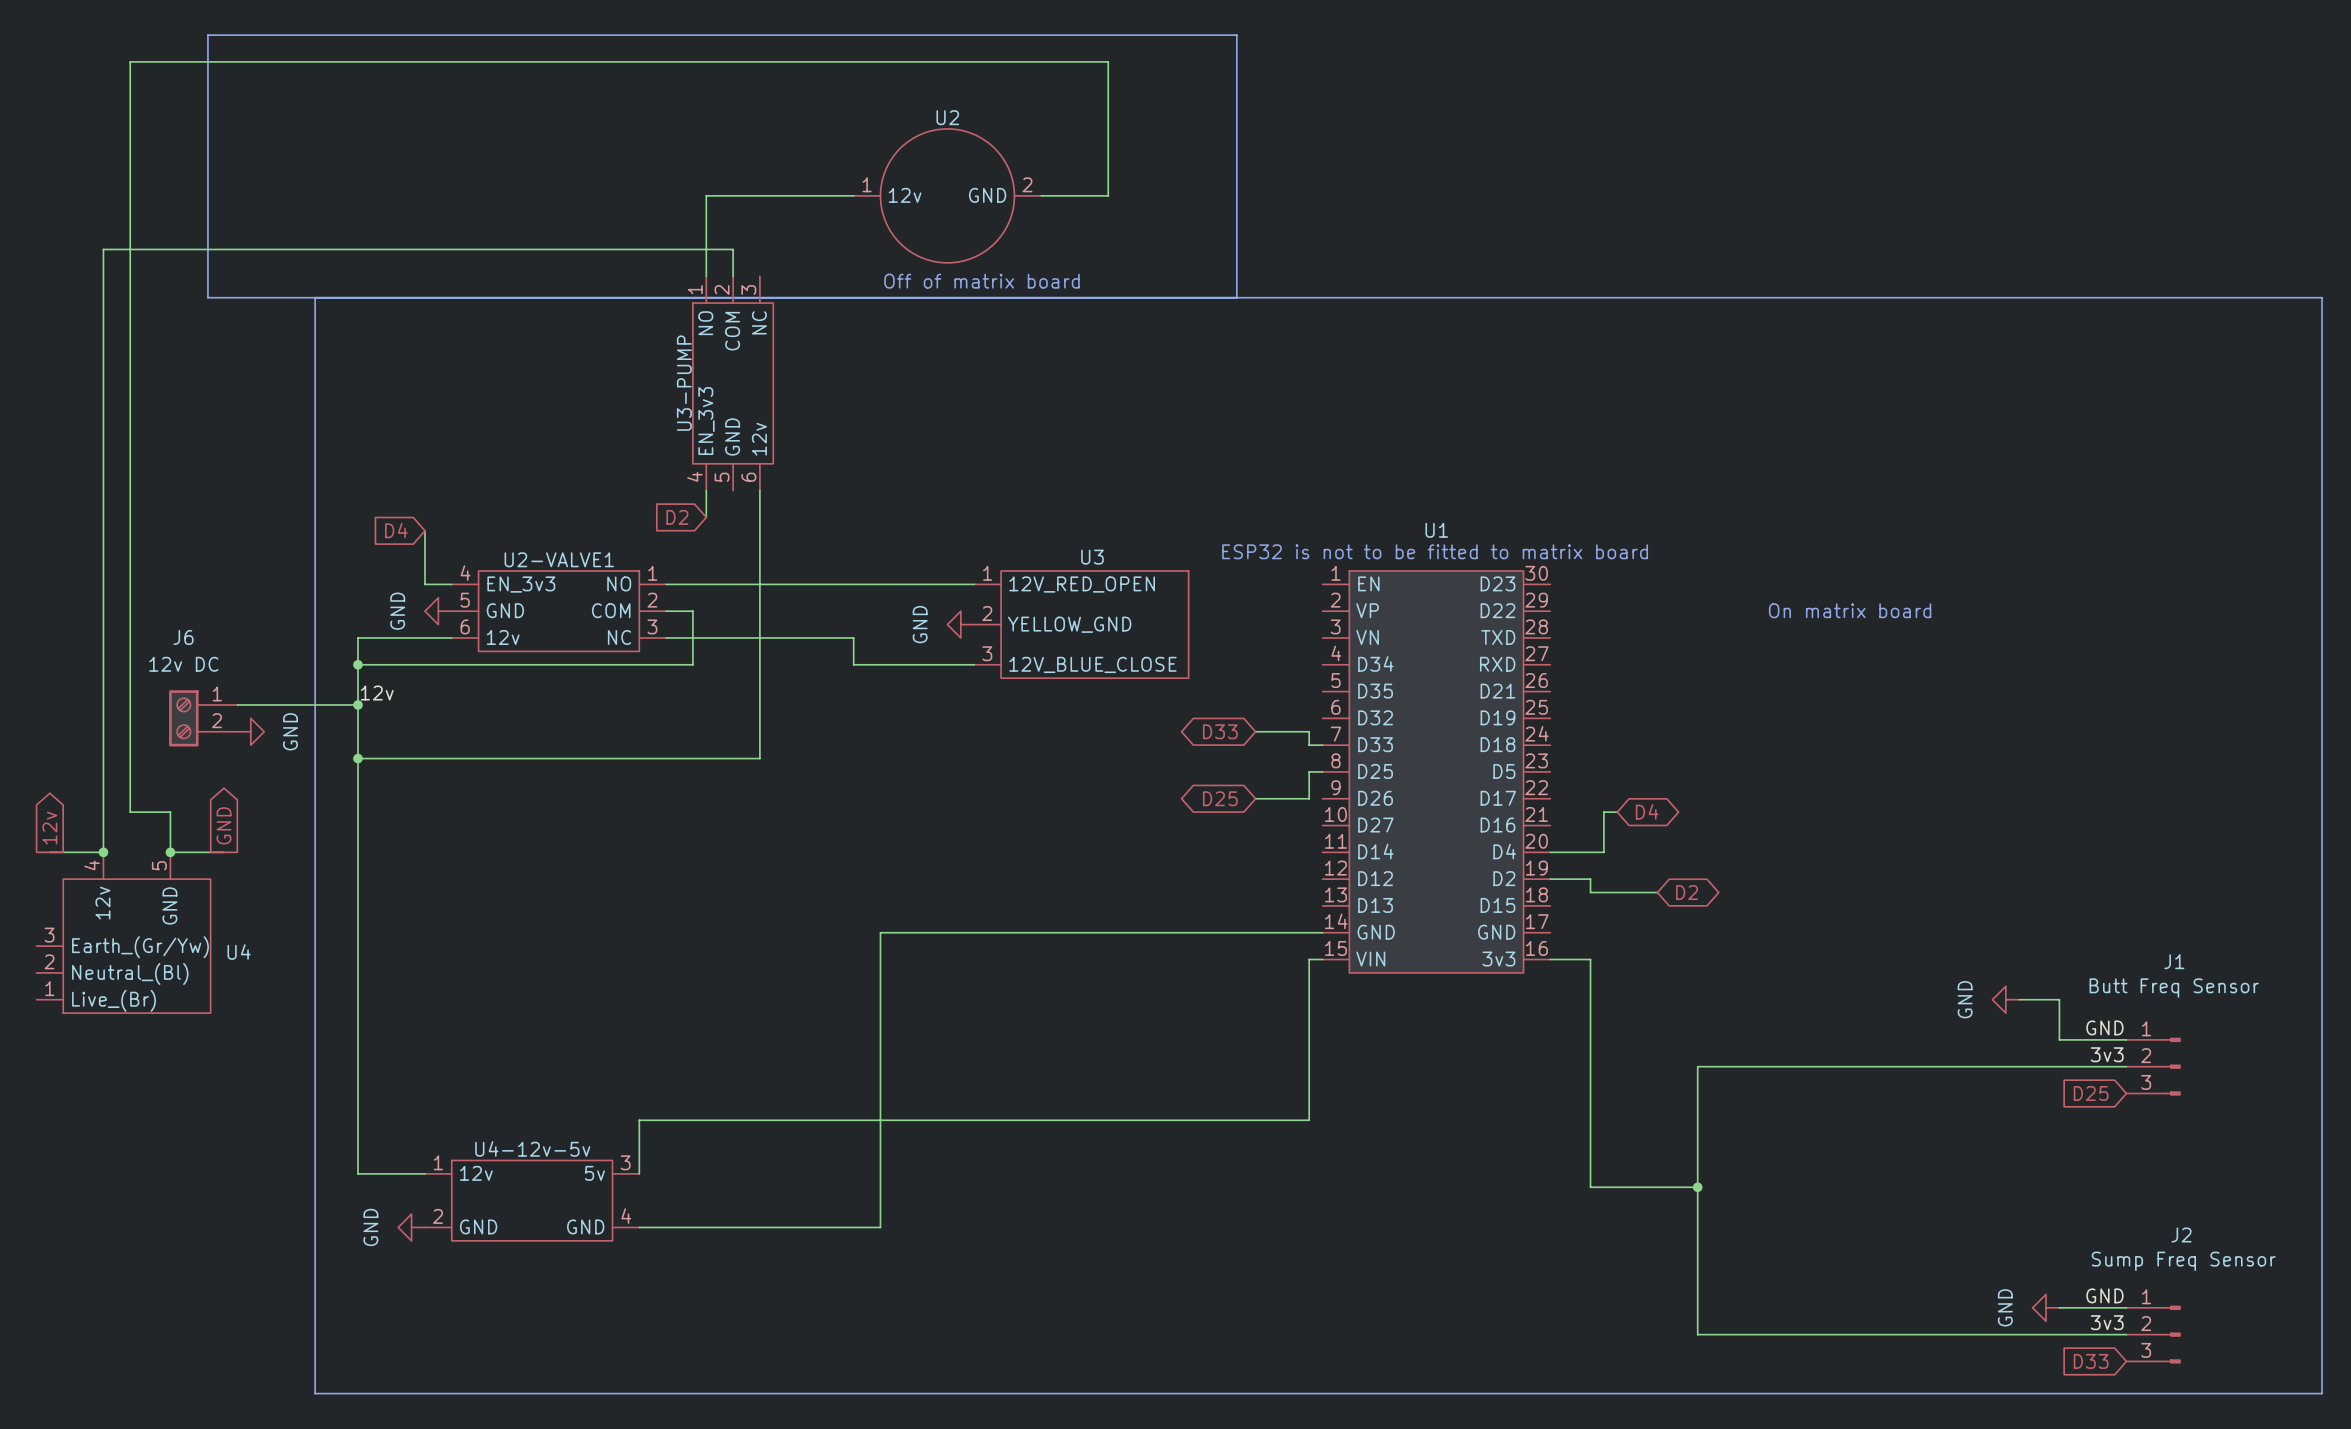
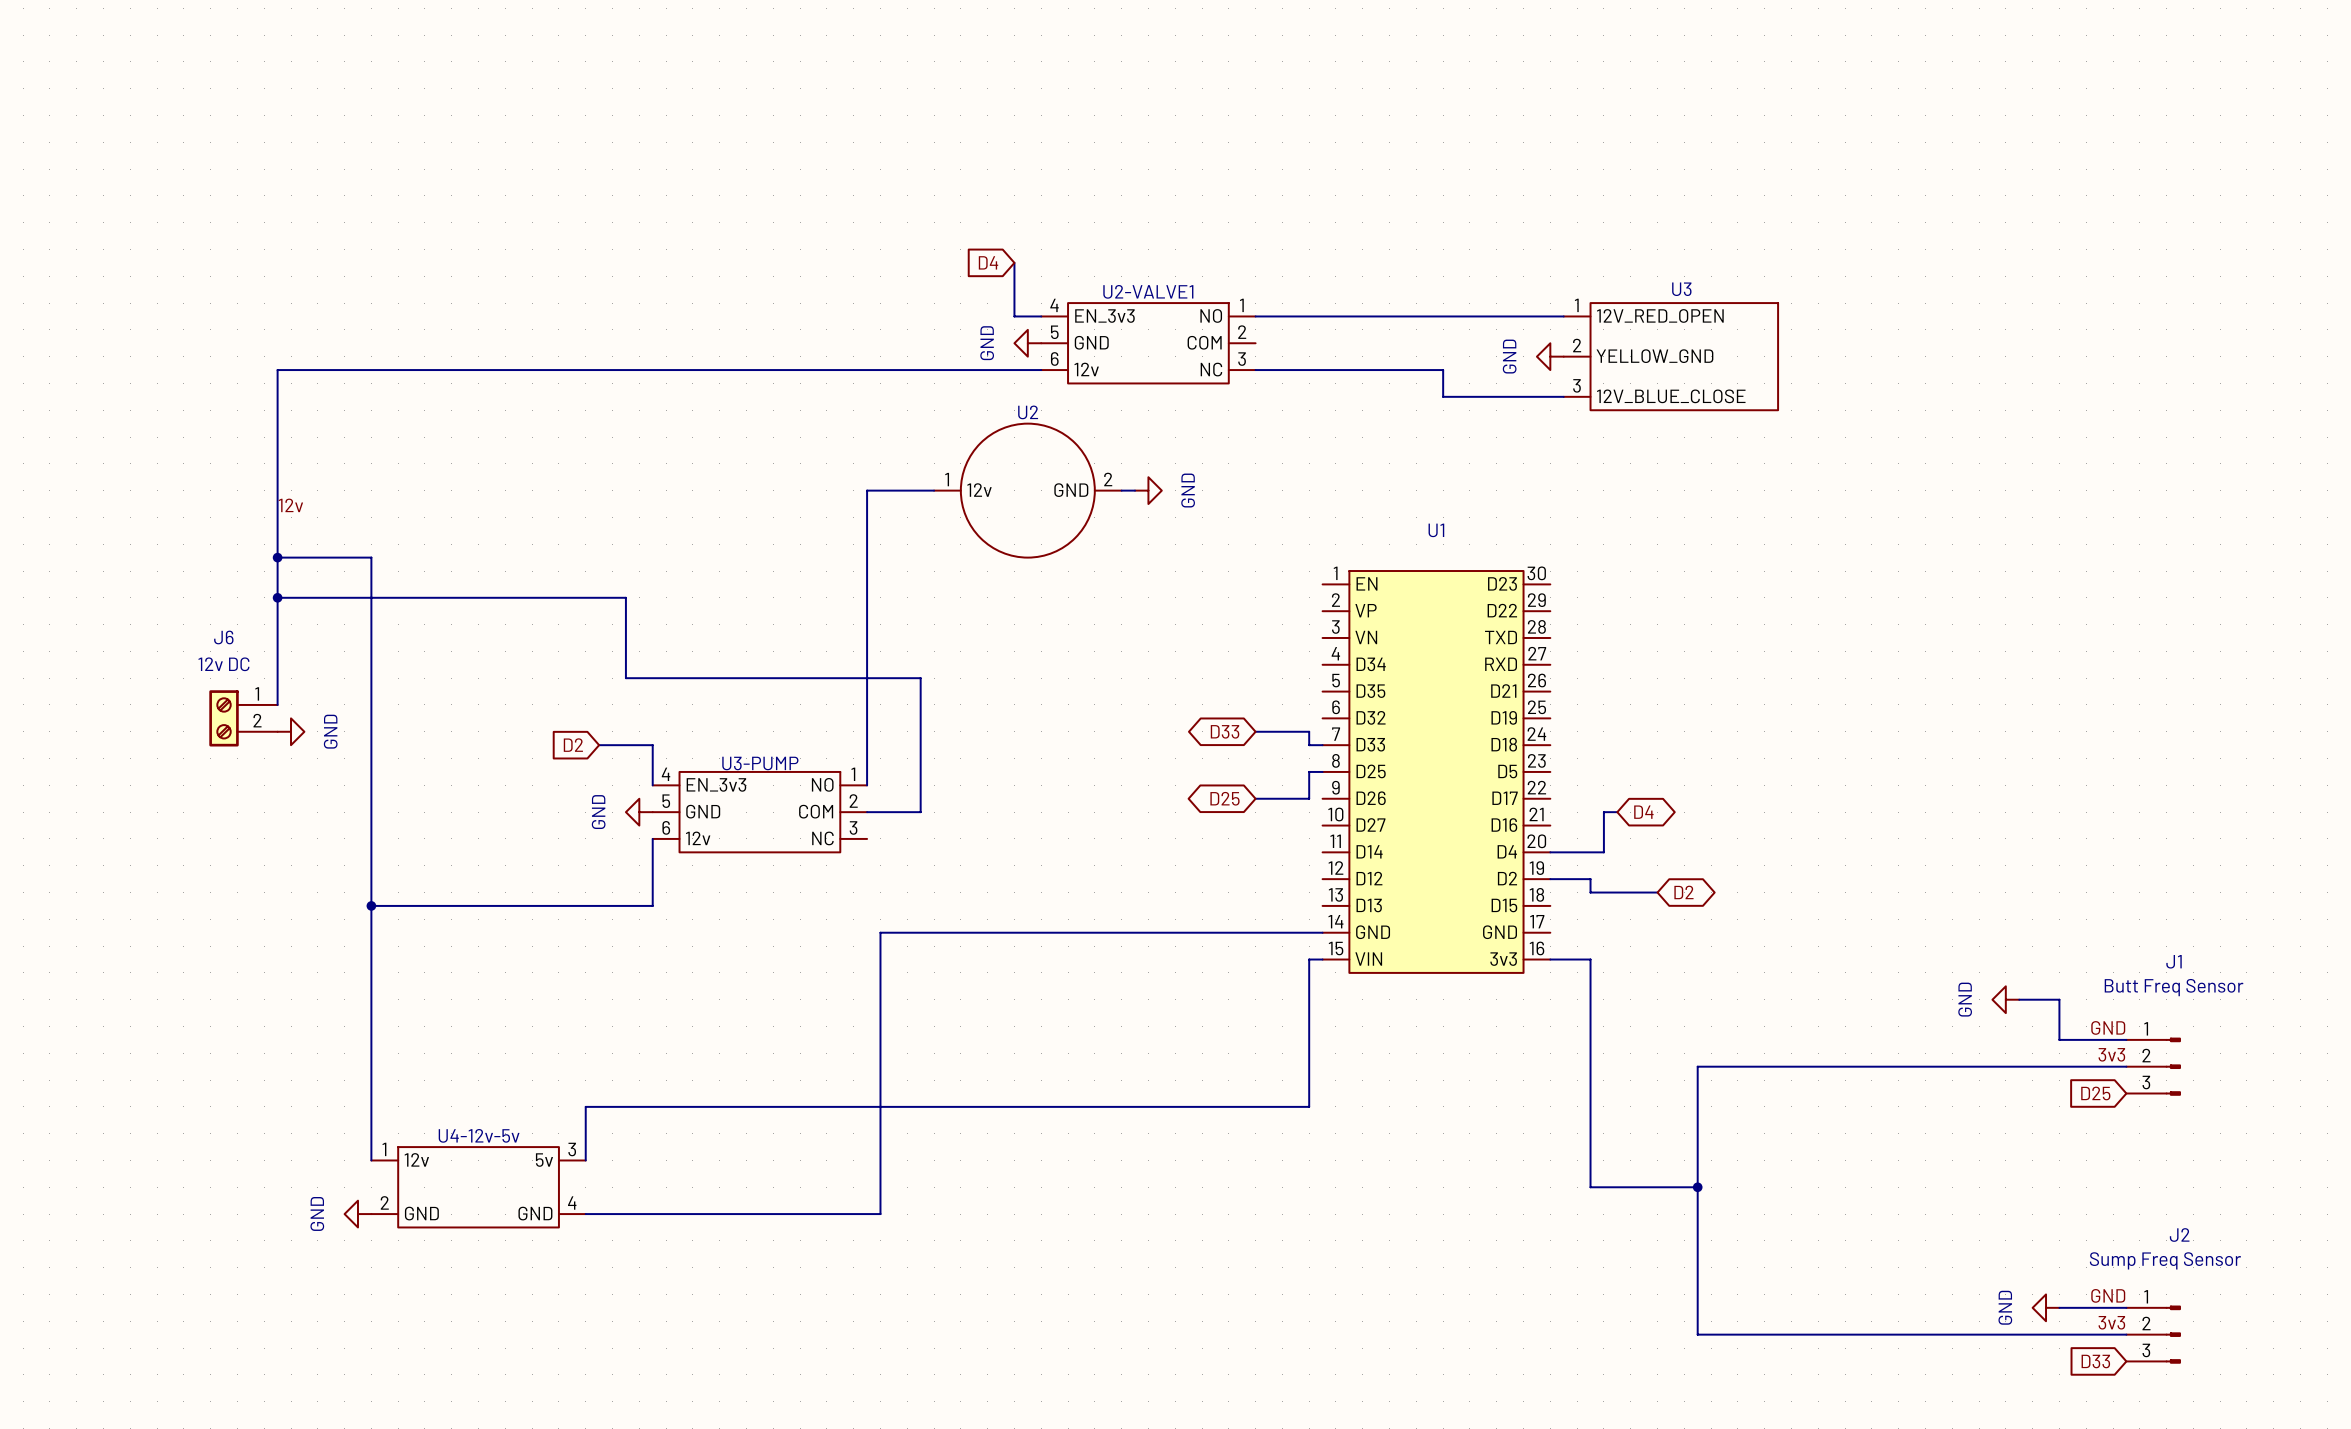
wire: (853, 195) (706, 195) (706, 276) -> none
U2 position: (947, 195) -> (1027, 490)
wire: (1041, 195) (1108, 195) (1108, 61) (130, 61) (130, 812) (170, 812) (170, 852) (224, 852) -> none
global label: none -> D4 (988, 262)
wire: none -> (1014, 262) (1014, 316) (1041, 316)
wire: (733, 276) (733, 249) (103, 249) (103, 852) (49, 852) -> none
text: Off of matrix board (981, 281) -> none
line: (315, 297) (315, 1393) (2322, 1393) (2322, 297) (207, 297) (207, 35) (1236, 35) (1236, 297) -> none
wire: none -> (1255, 316) (1563, 316)
power symbol: none -> GND (1027, 343)
power symbol: none -> GND (1550, 356)
wire: none -> (1041, 370) (277, 370) (277, 704)
wire: none -> (1255, 370) (1443, 370) (1443, 396) (1563, 396)
U3-PUMP rotation: 0° (733, 383) -> 90° clockwise (759, 812)
U3-PUMP position: (733, 383) -> (759, 812)
wire: (706, 490) (706, 517) -> none
wire: (759, 490) (759, 758) (357, 758) -> none
wire: none -> (934, 490) (867, 490) (867, 785)
wire: none -> (1121, 490) (1135, 490)
power symbol: none -> GND (1148, 490)
global label position: D2 (677, 517) -> D2 (573, 745)
global label: D4 (396, 530) -> none
wire: (424, 530) (424, 584) (451, 584) -> none
text: ESP32 is not to be fitted to matrix board (1435, 551) -> none
wire: none -> (277, 557) (371, 557) (371, 1160)
junction: none -> (277, 557)
wire: (666, 584) (974, 584) -> none
wire: none -> (277, 597) (625, 597) (625, 678) (920, 678) (920, 812) (867, 812)
junction: none -> (277, 597)
text: On matrix board (1850, 610) -> none
power symbol: GND (438, 611) -> none
U2-VALVE1 position: (558, 611) -> (1148, 343)
wire: (666, 611) (692, 611) (692, 664) (357, 664) -> none
power symbol: GND (960, 624) -> none
U3 position: (1081, 624) -> (1670, 356)
wire: (451, 637) (357, 637) (357, 1173) (424, 1173) -> none
wire: (666, 637) (853, 637) (853, 664) (974, 664) -> none
junction: (357, 664) -> none
label position: 12v (377, 693) -> 12v (290, 505)
wire: (237, 704) (357, 704) -> none
junction: (357, 704) -> none
J6 position: (203, 718) -> (243, 718)
power symbol position: GND (250, 731) -> GND (291, 731)
wire: none -> (599, 745) (652, 745) (652, 785)
junction: (357, 758) -> none
power symbol: none -> GND (639, 812)
global label: GND (224, 825) -> none
global label: 12v (49, 828) -> none
wire: none -> (652, 838) (652, 905) (371, 905)
junction: (103, 852) -> none
junction: (170, 852) -> none
junction: none -> (371, 905)
U4: (123, 932) -> none
wire: (1309, 1106) (1309, 1120) (639, 1120) (639, 1173) -> (1309, 1106) (585, 1106) (585, 1160)
U4-12v-5v position: (532, 1200) -> (478, 1187)
wire: (880, 1214) (880, 1227) (639, 1227) -> (880, 1214) (585, 1214)
power symbol position: GND (411, 1227) -> GND (357, 1214)

